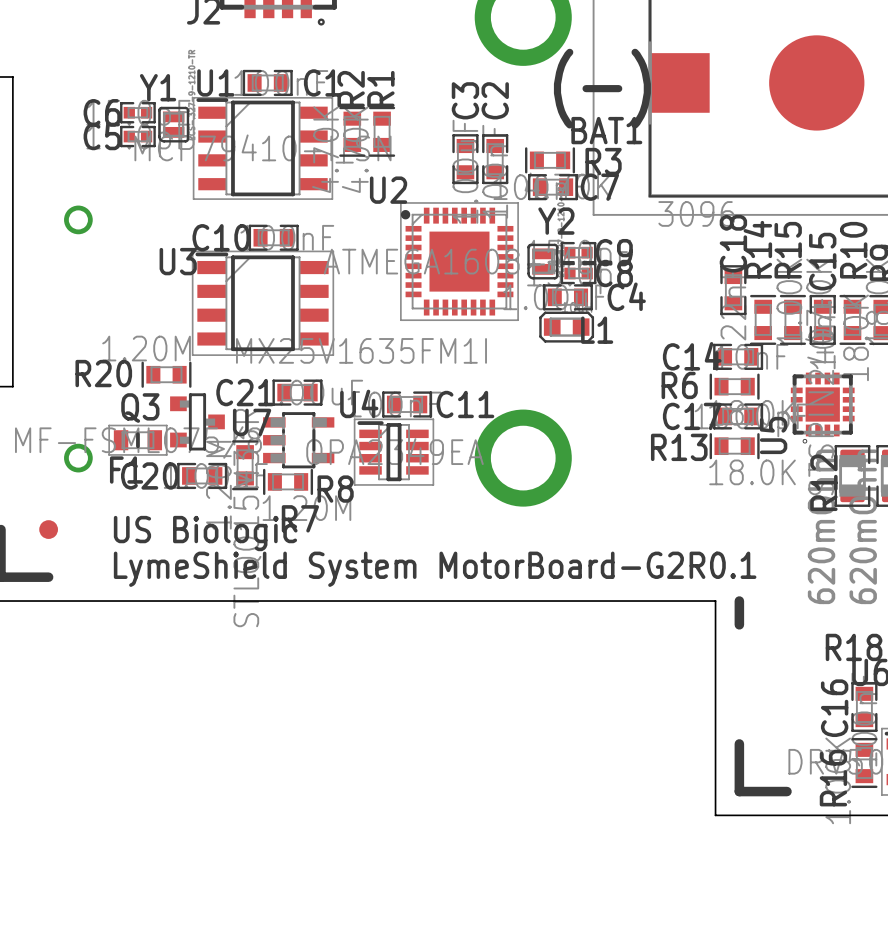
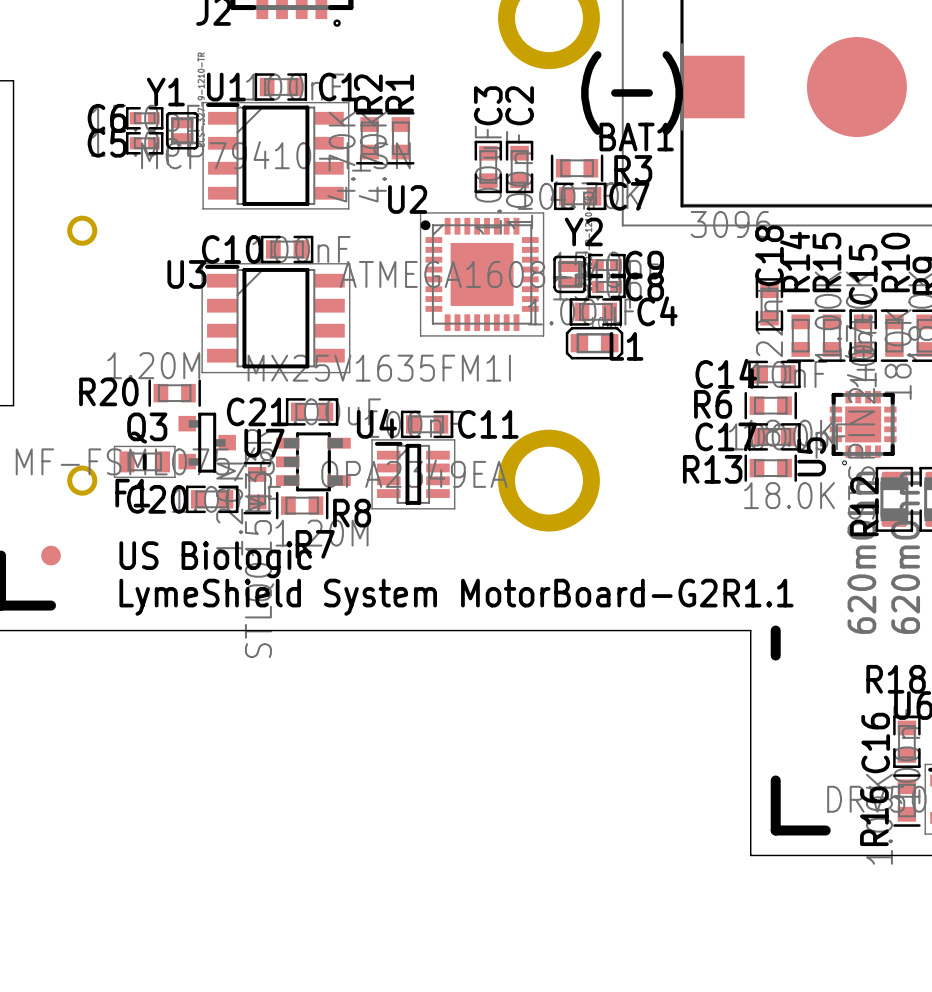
text: LymeShield System MotorBoard-G2R0.1 (435, 569) -> LymeShield System MotorBoard-G2R1.1 (456, 597)

